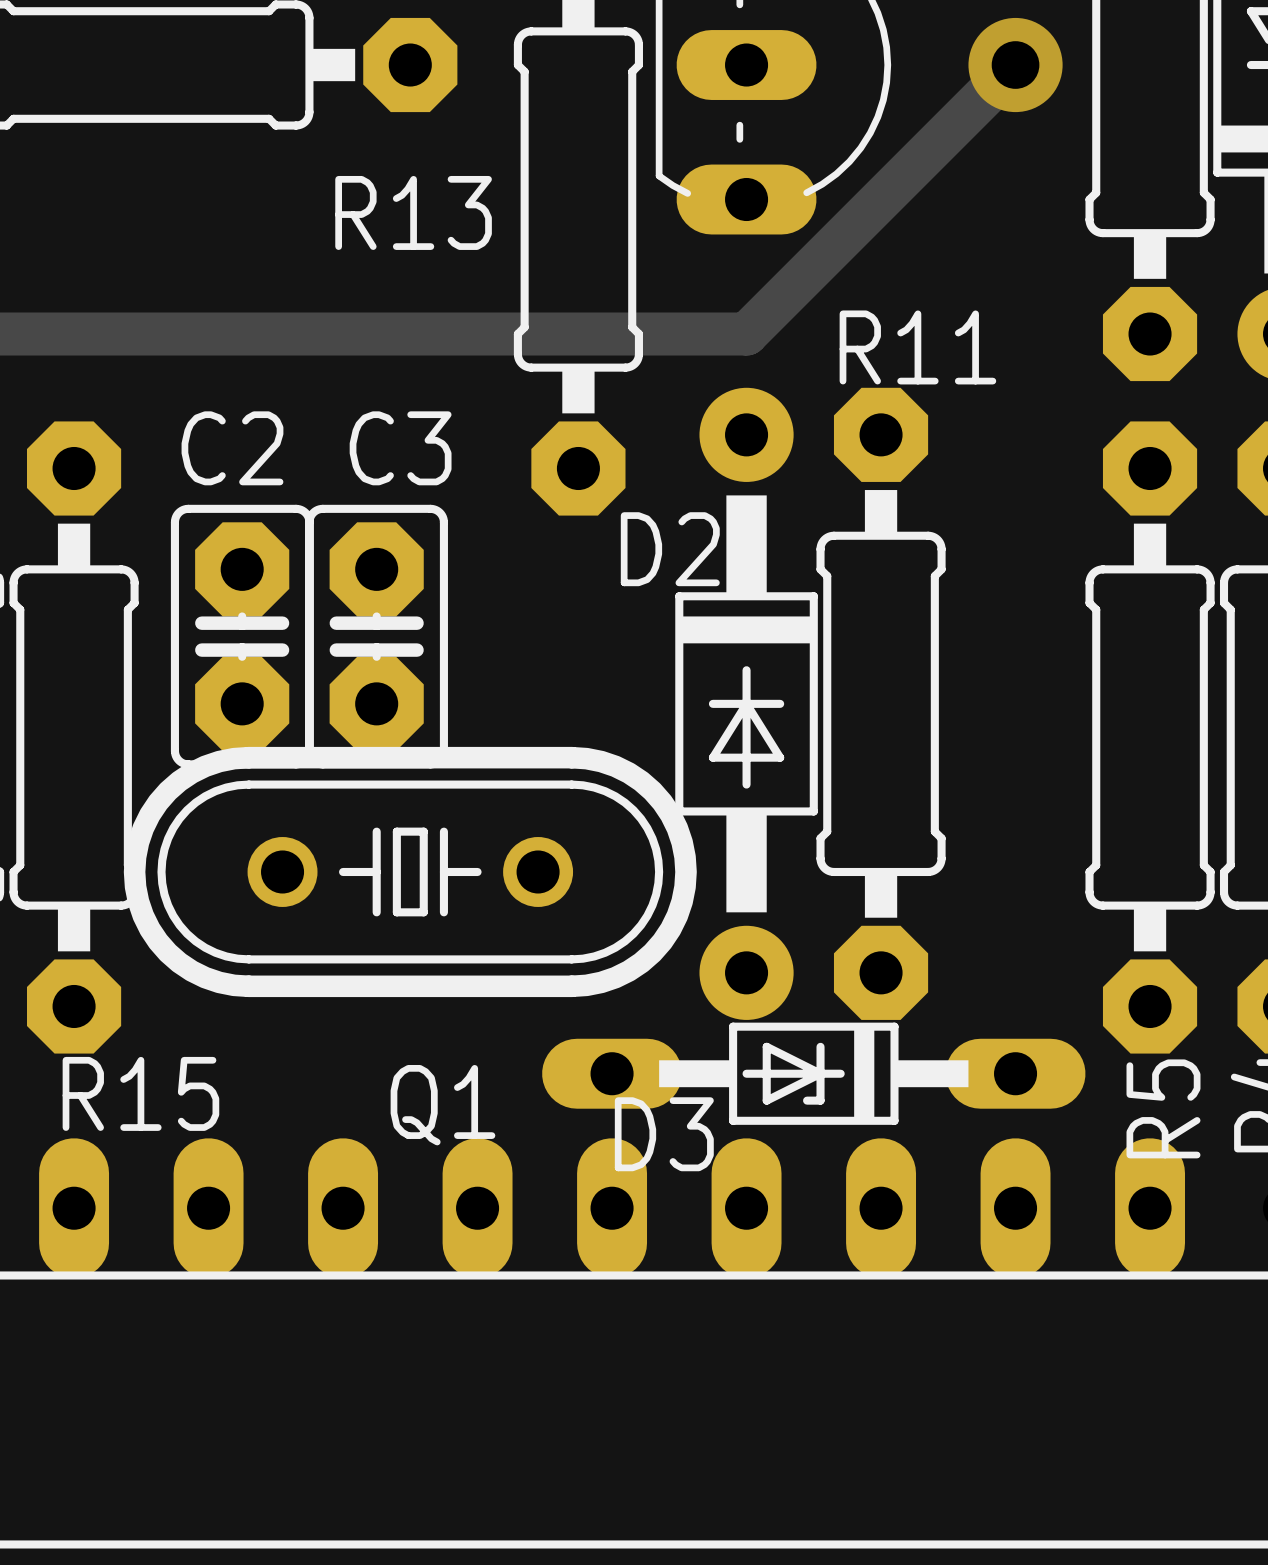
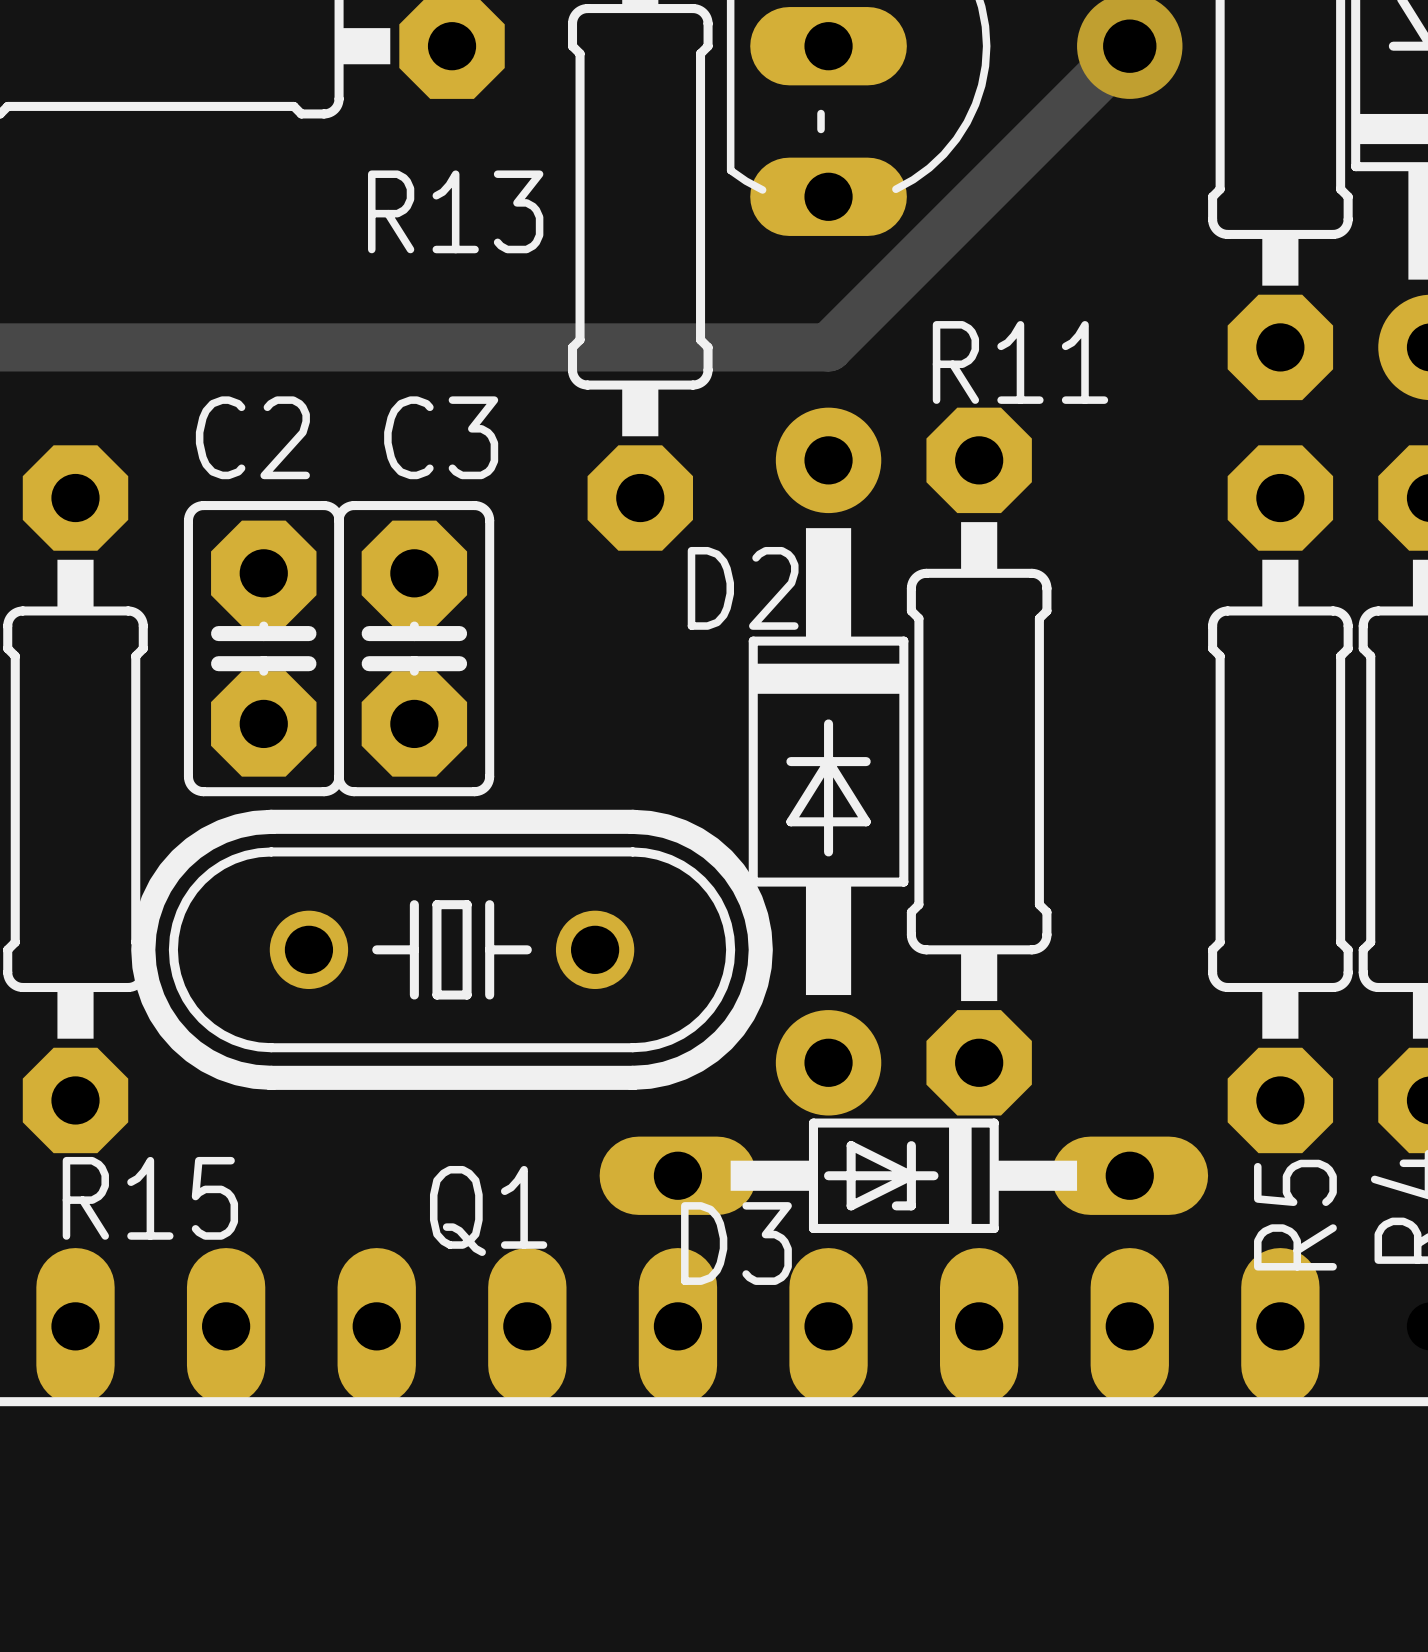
C2 position: (242, 636) -> (263, 648)
C3 position: (376, 636) -> (414, 648)

